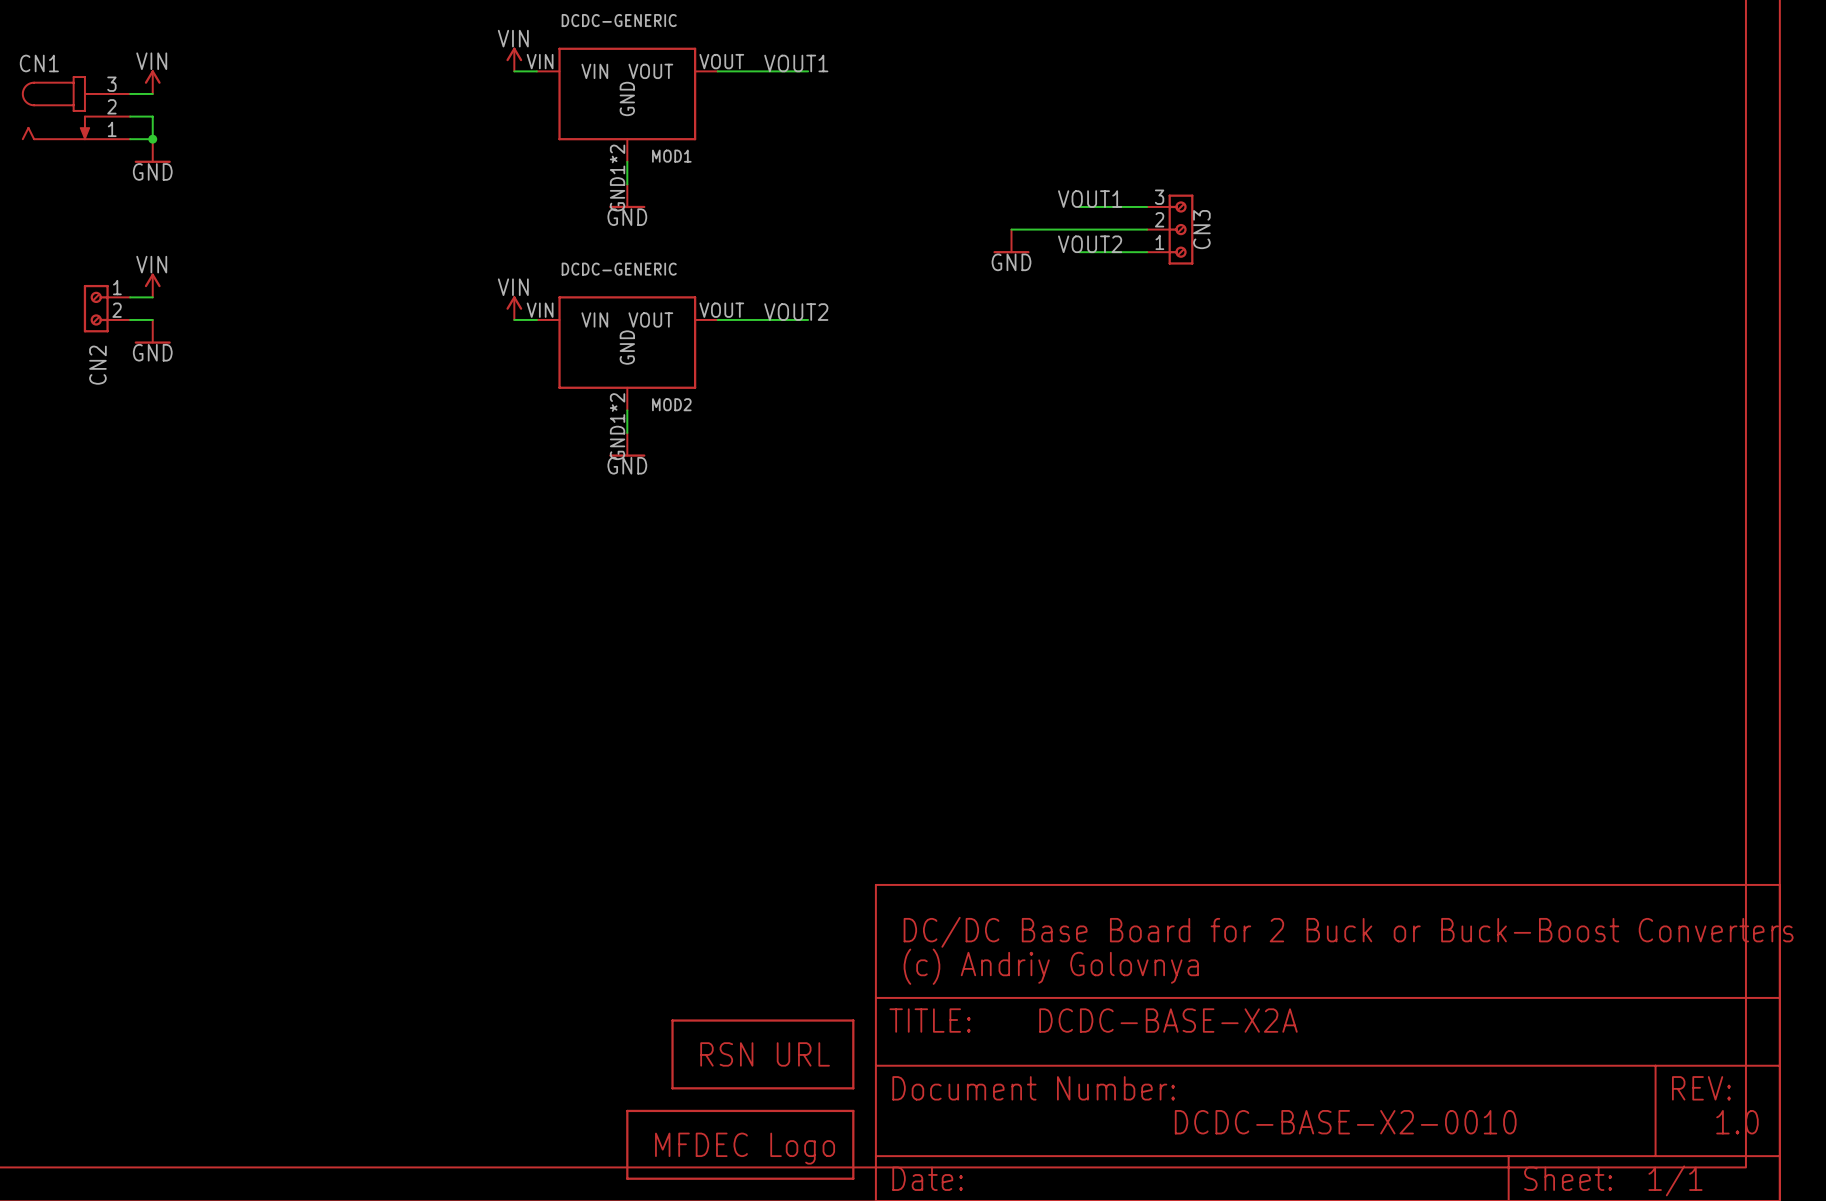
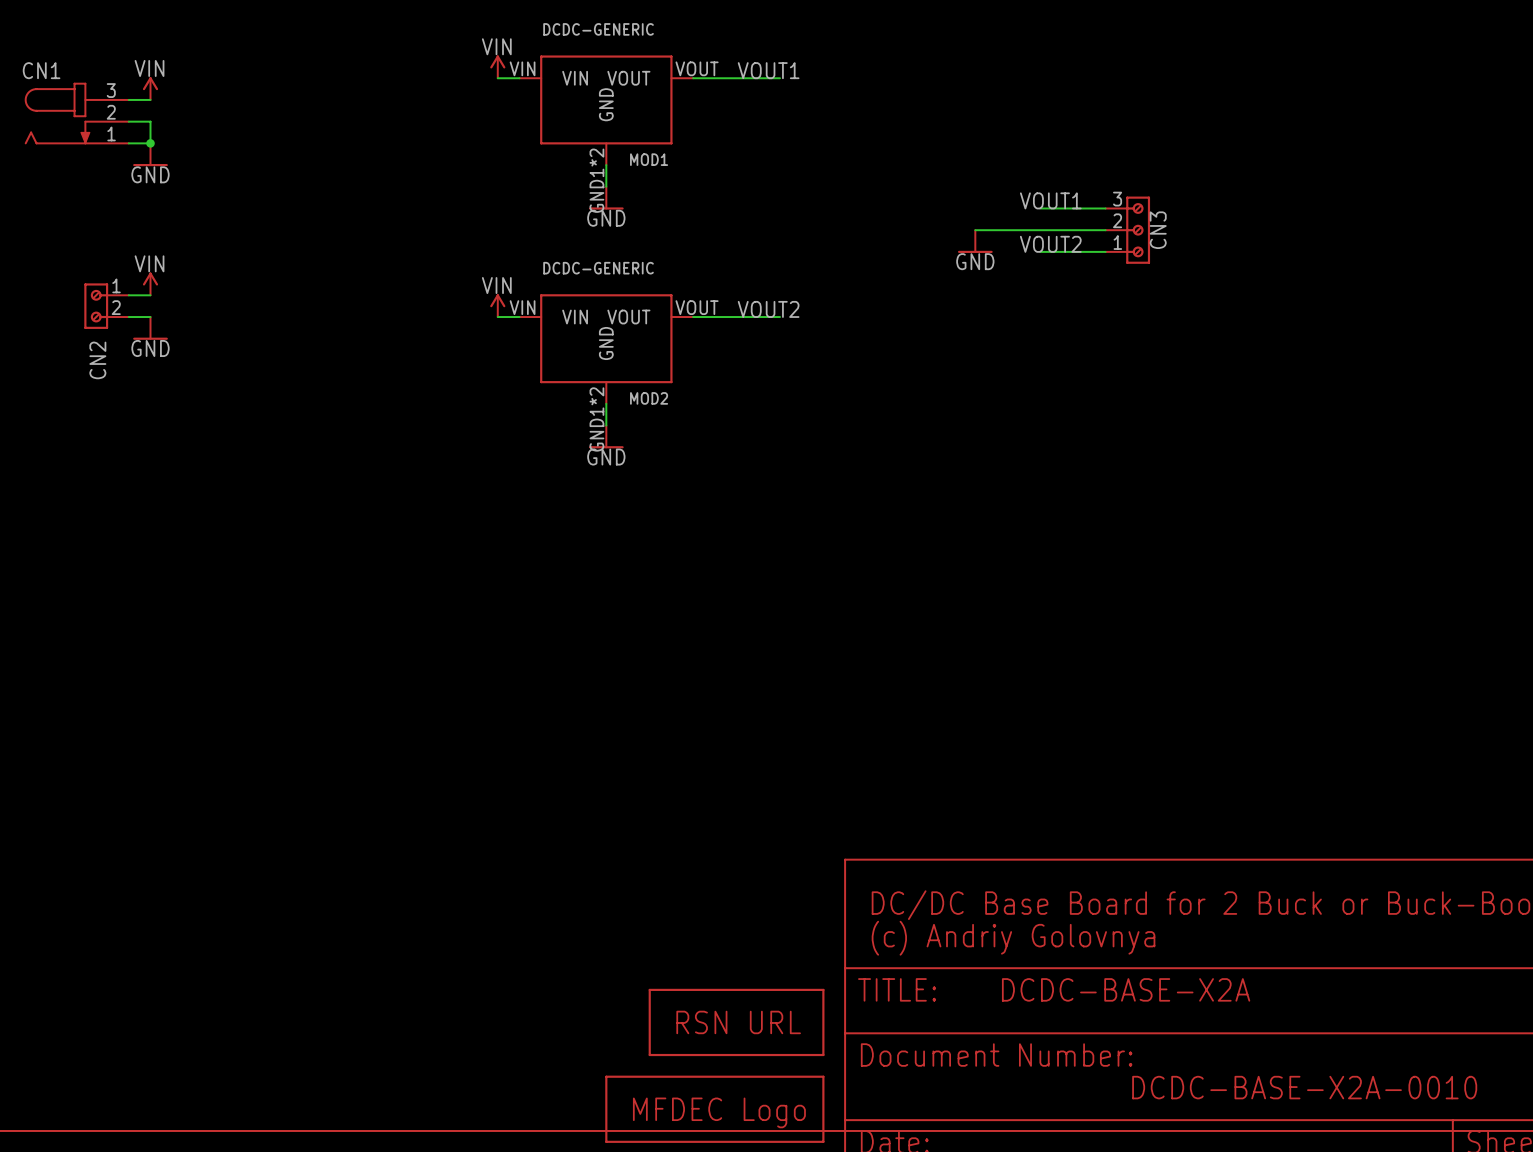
text: DCDC-BASE-X2-0010 (1345, 1122) -> DCDC-BASE-X2A-0010 (1304, 1087)

